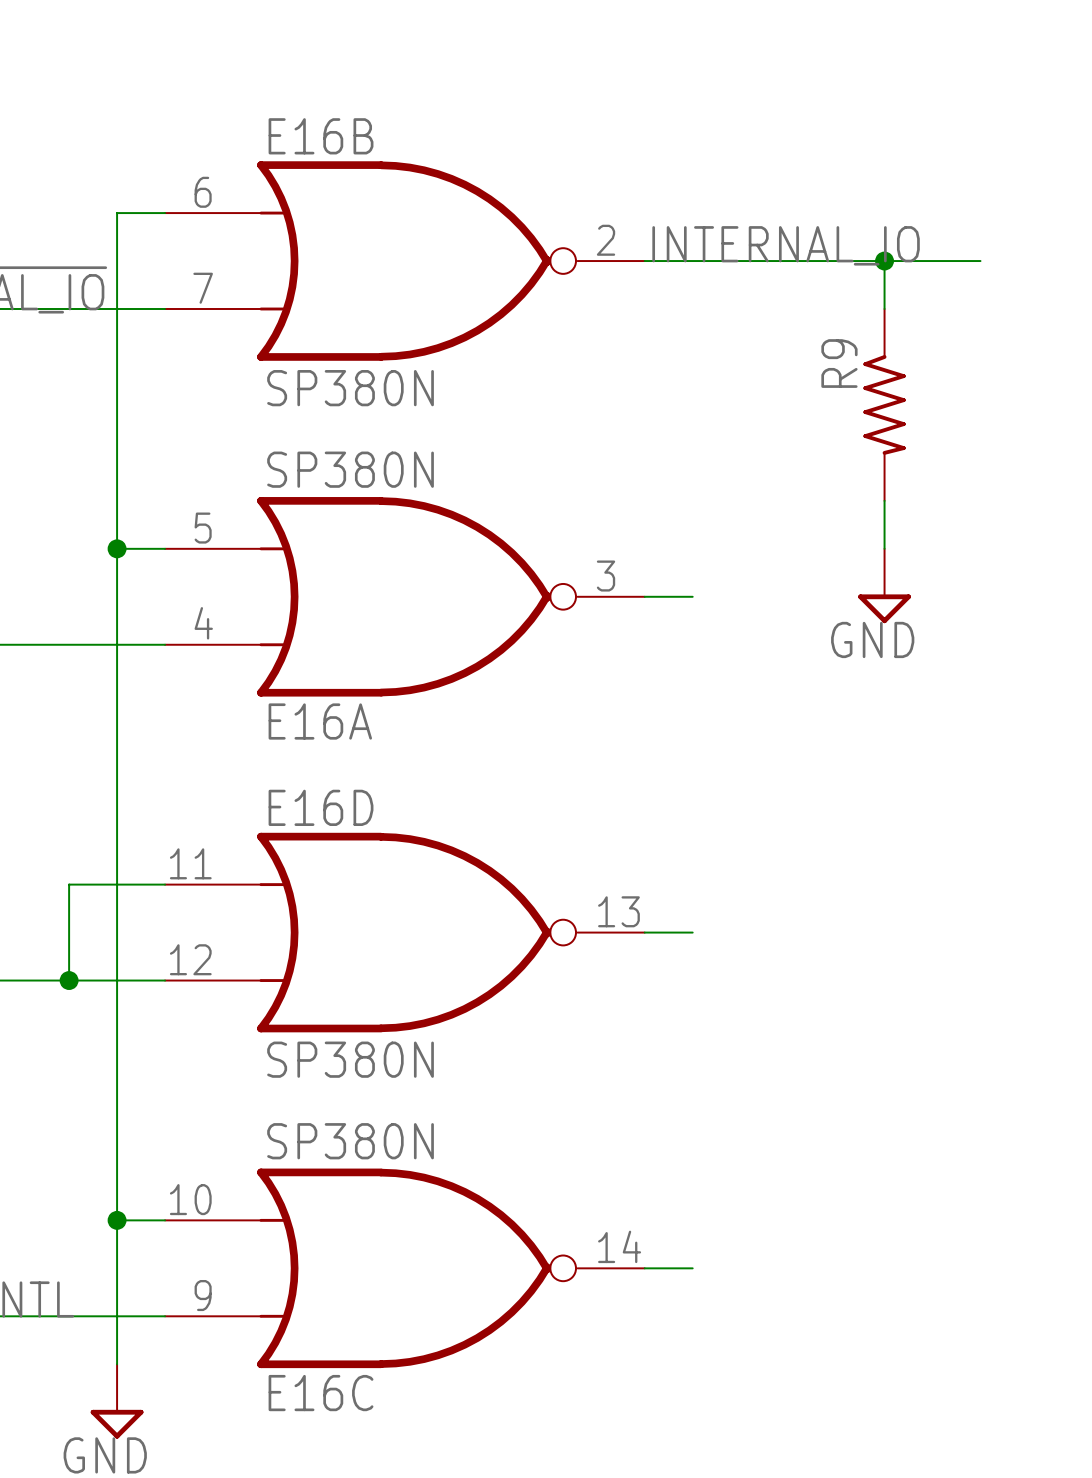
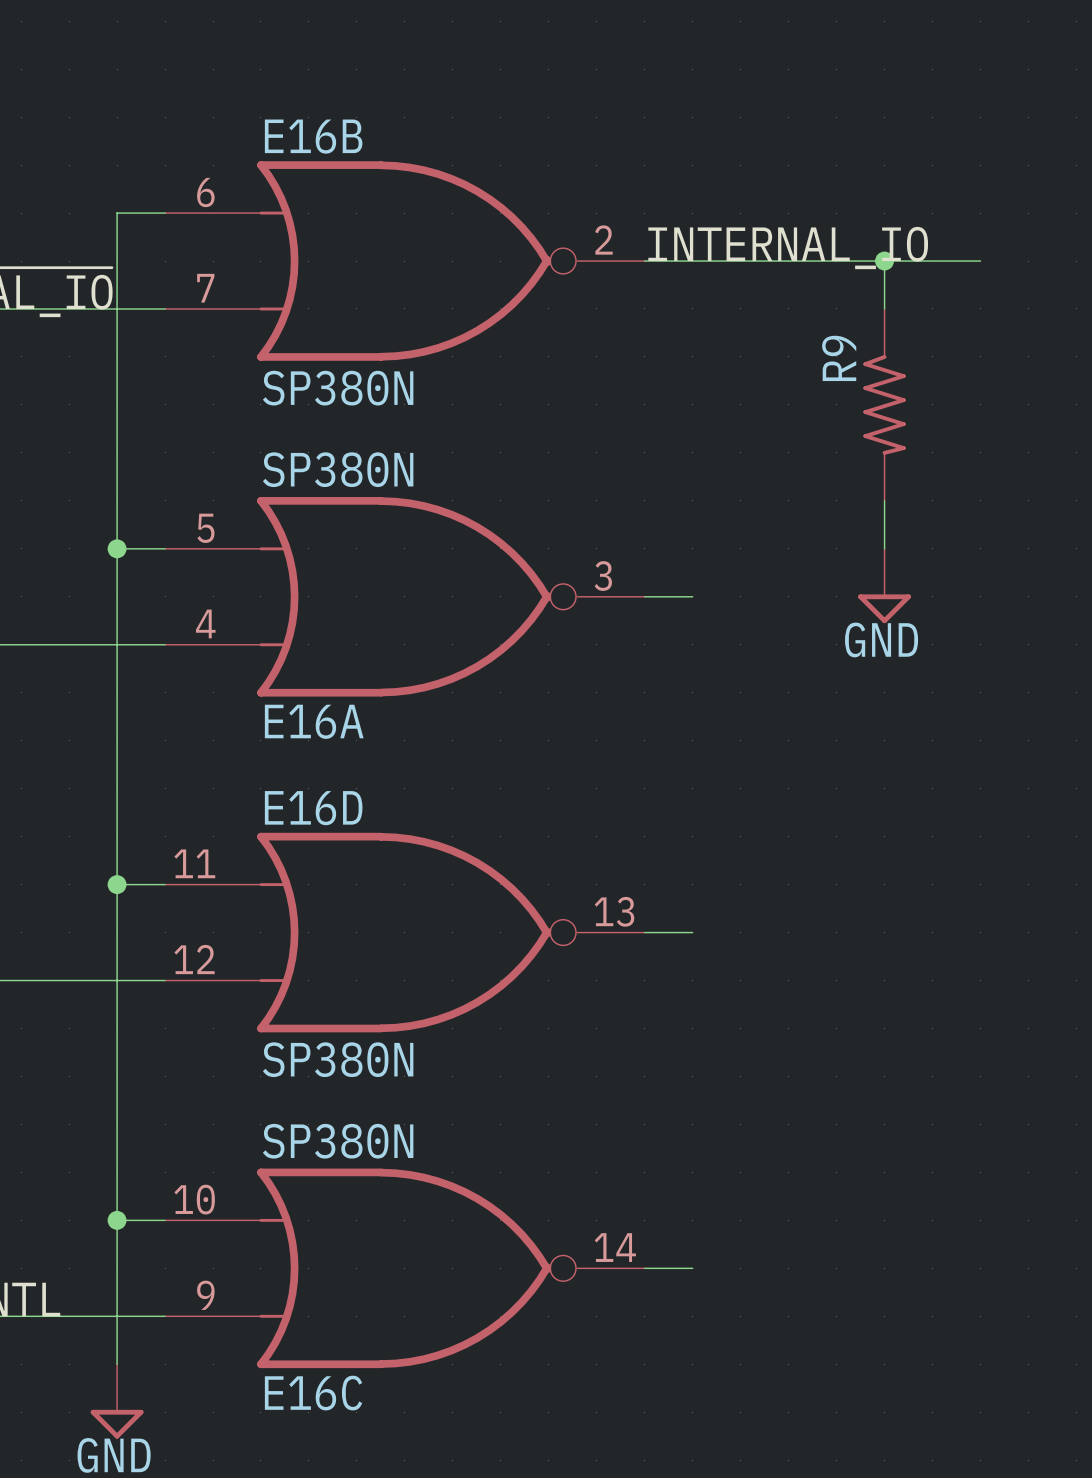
wire: (117, 884) (69, 884) (69, 980) -> none
junction position: (69, 980) -> (117, 884)

